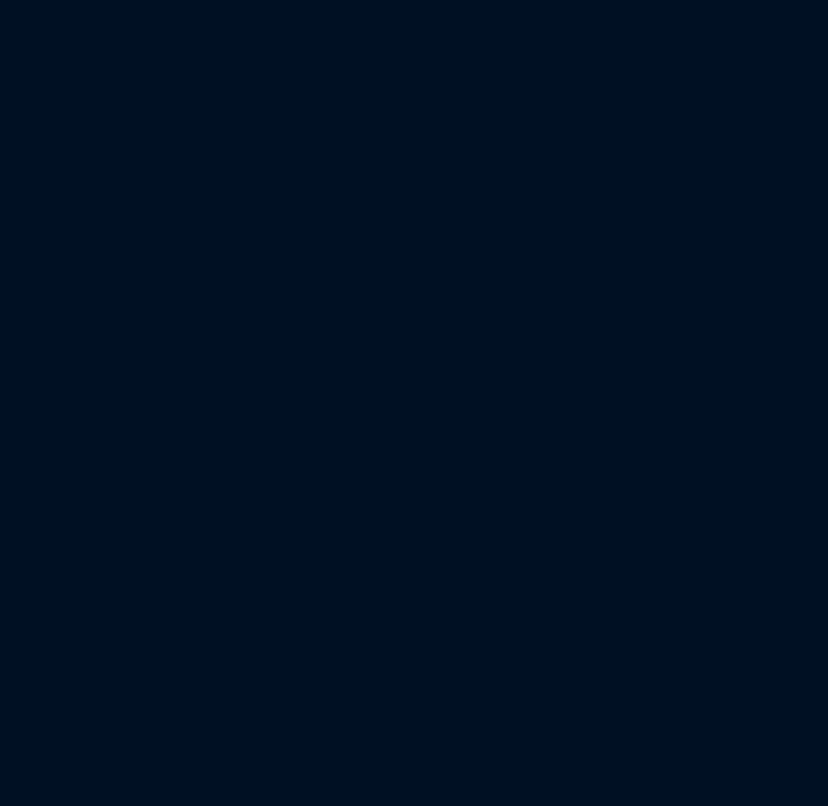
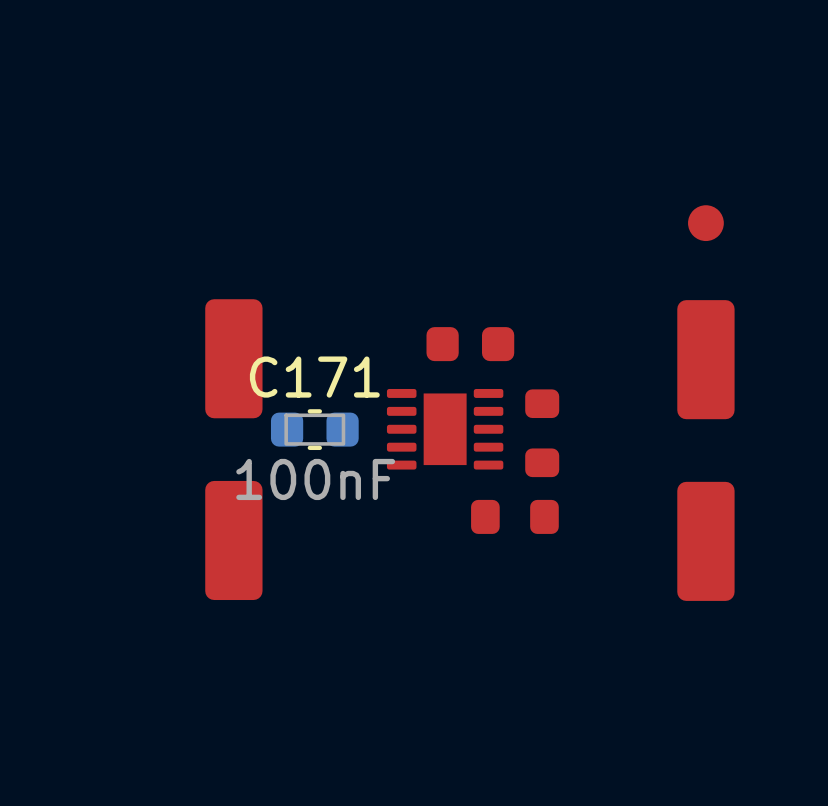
part: none -> (705, 223)
part: none -> (470, 344)
C171: none -> 100nF (314, 429)
part: none -> (445, 429)
part: none -> (542, 433)
part: none -> (233, 449)
part: none -> (705, 450)
part: none -> (514, 516)

